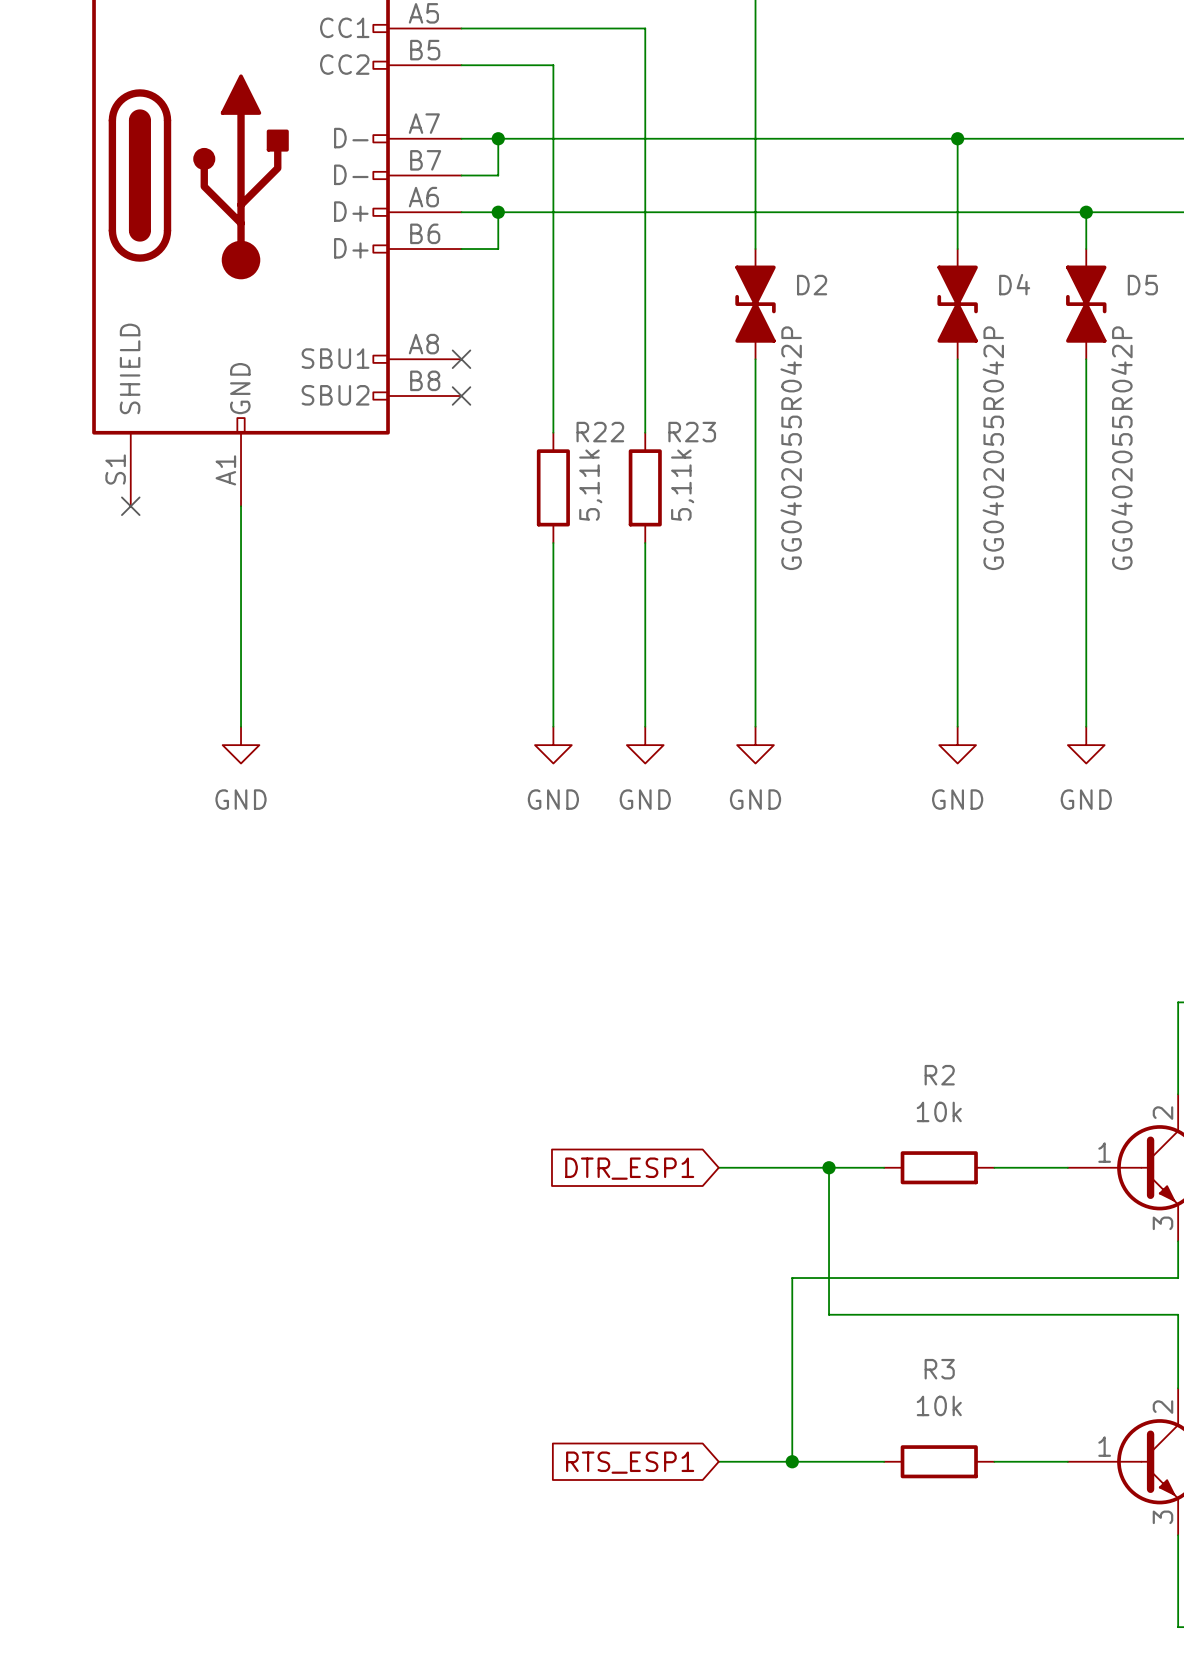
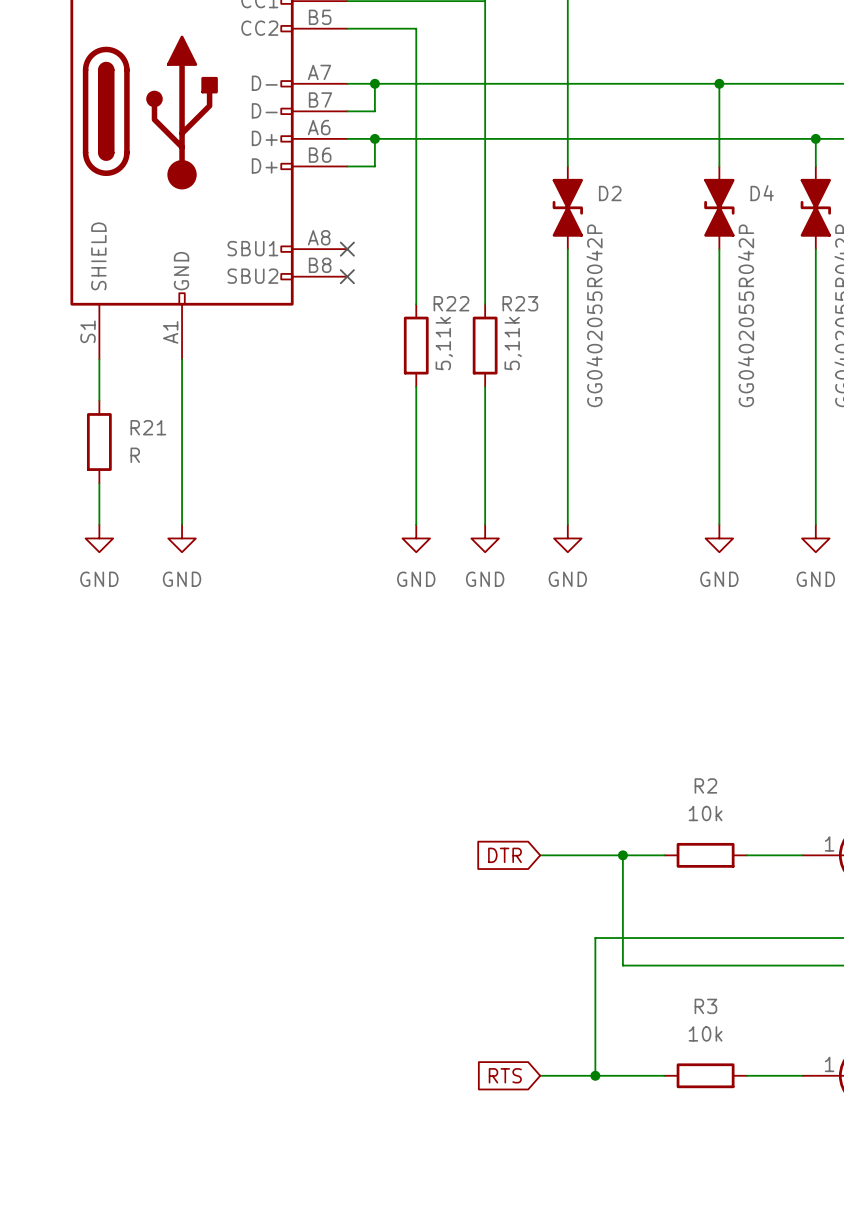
wire: none -> (99, 359) (99, 400)
no-connect mark: (130, 506) -> none
R21: none -> R (99, 442)
wire: none -> (99, 483) (99, 524)
power symbol: none -> GND (99, 538)
global label: DTR_ESP1 (629, 1168) -> DTR (504, 855)
global label: RTS_ESP1 (630, 1462) -> RTS (505, 1075)

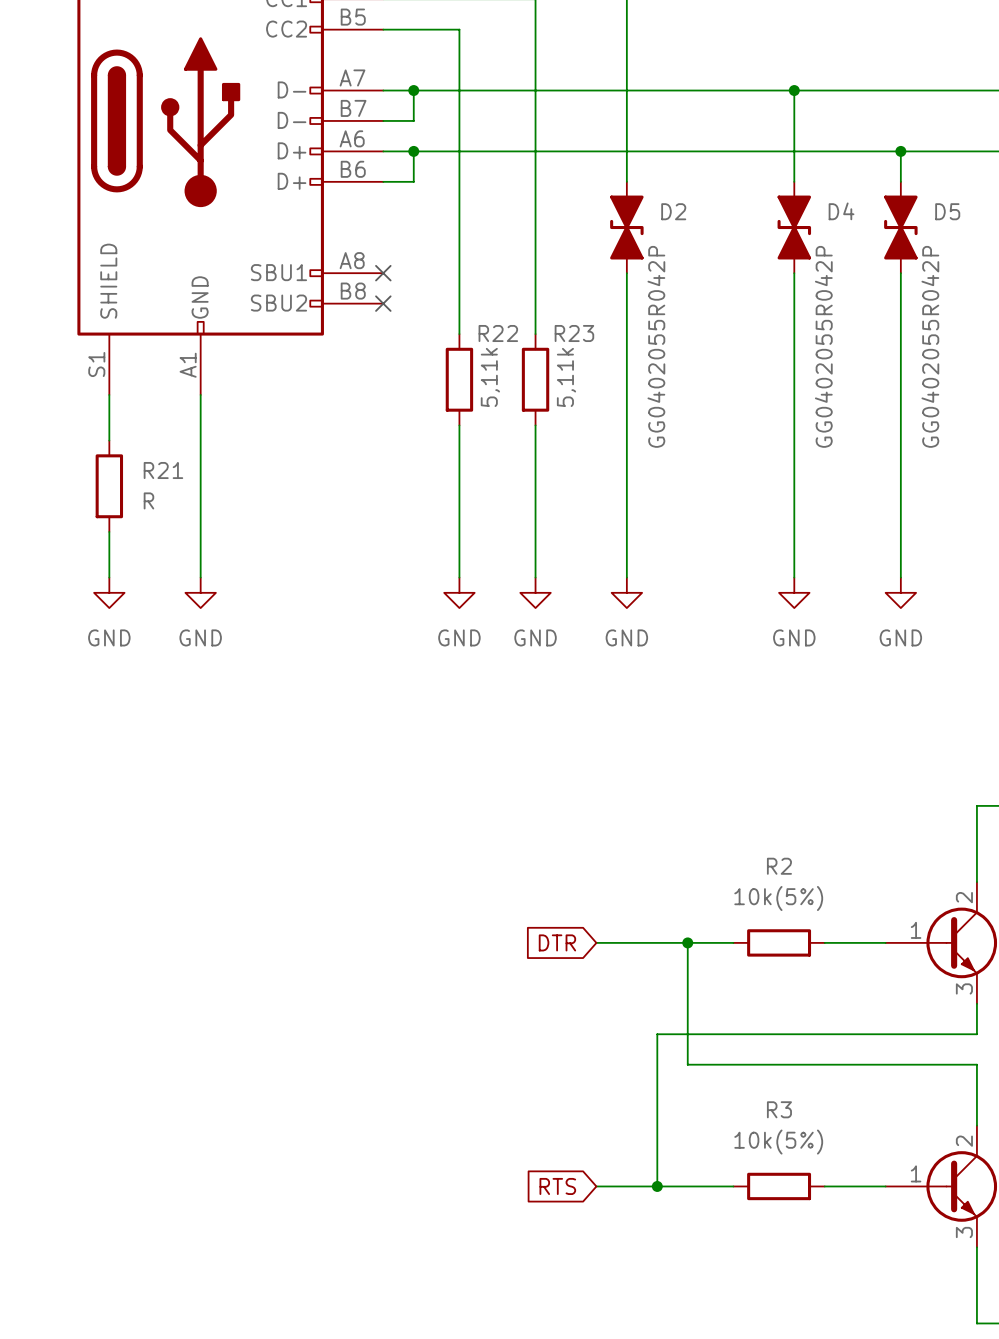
R2 value: 10k (705, 813) -> 10k(5%) (778, 898)
R3 value: 10k (705, 1033) -> 10k(5%) (778, 1142)

